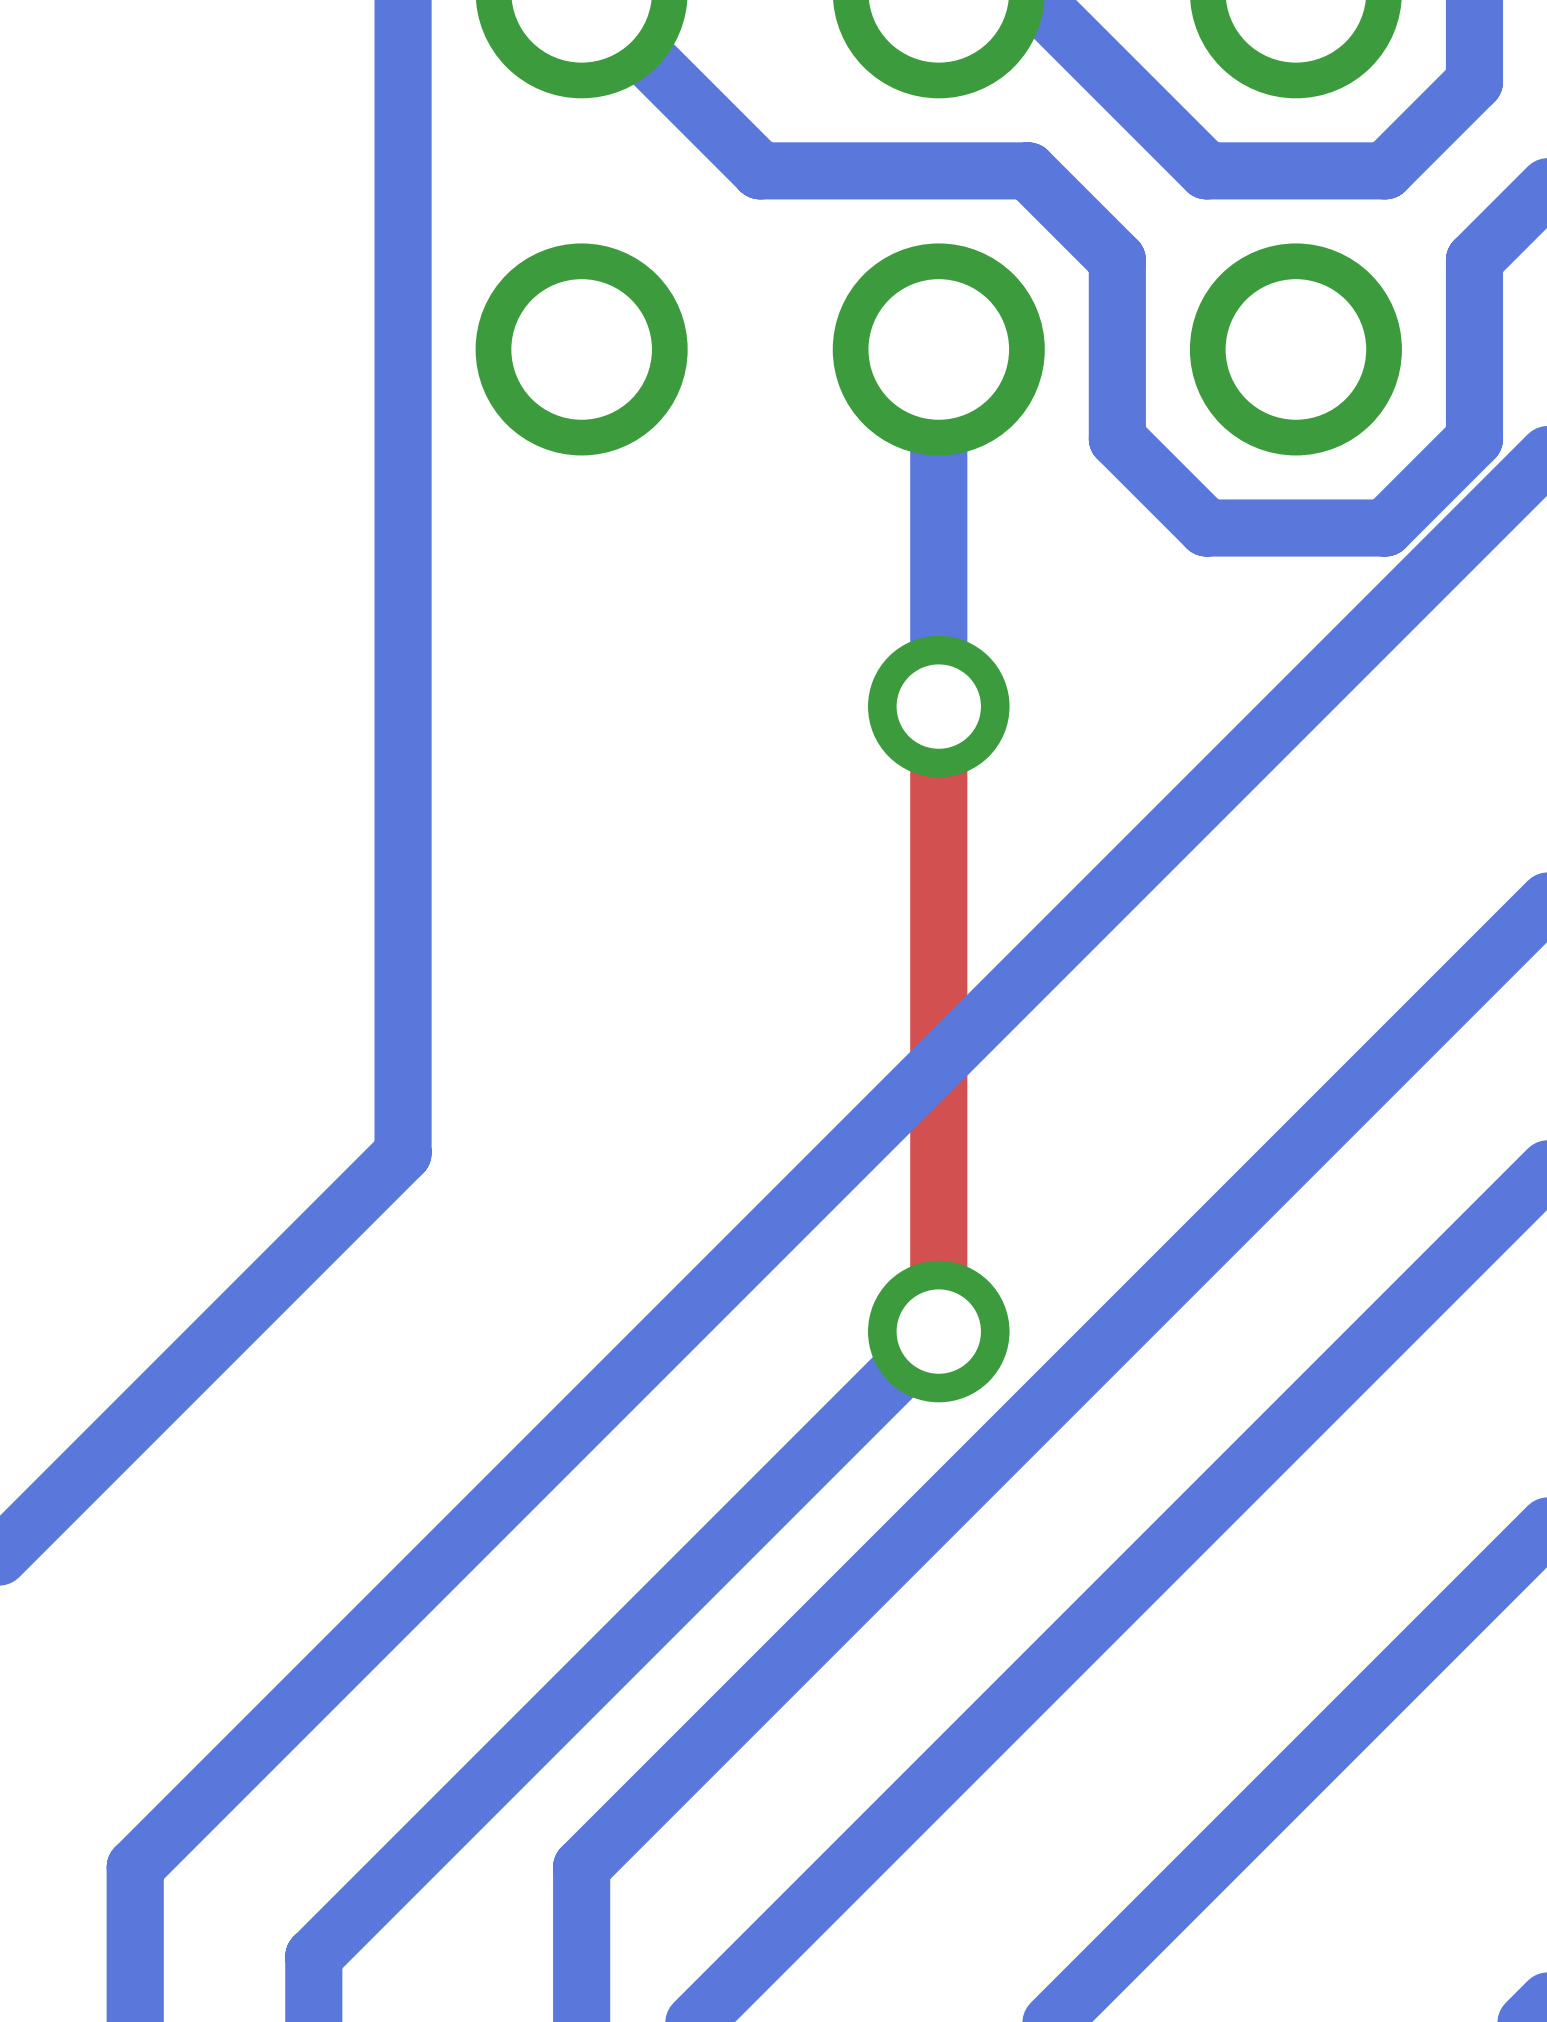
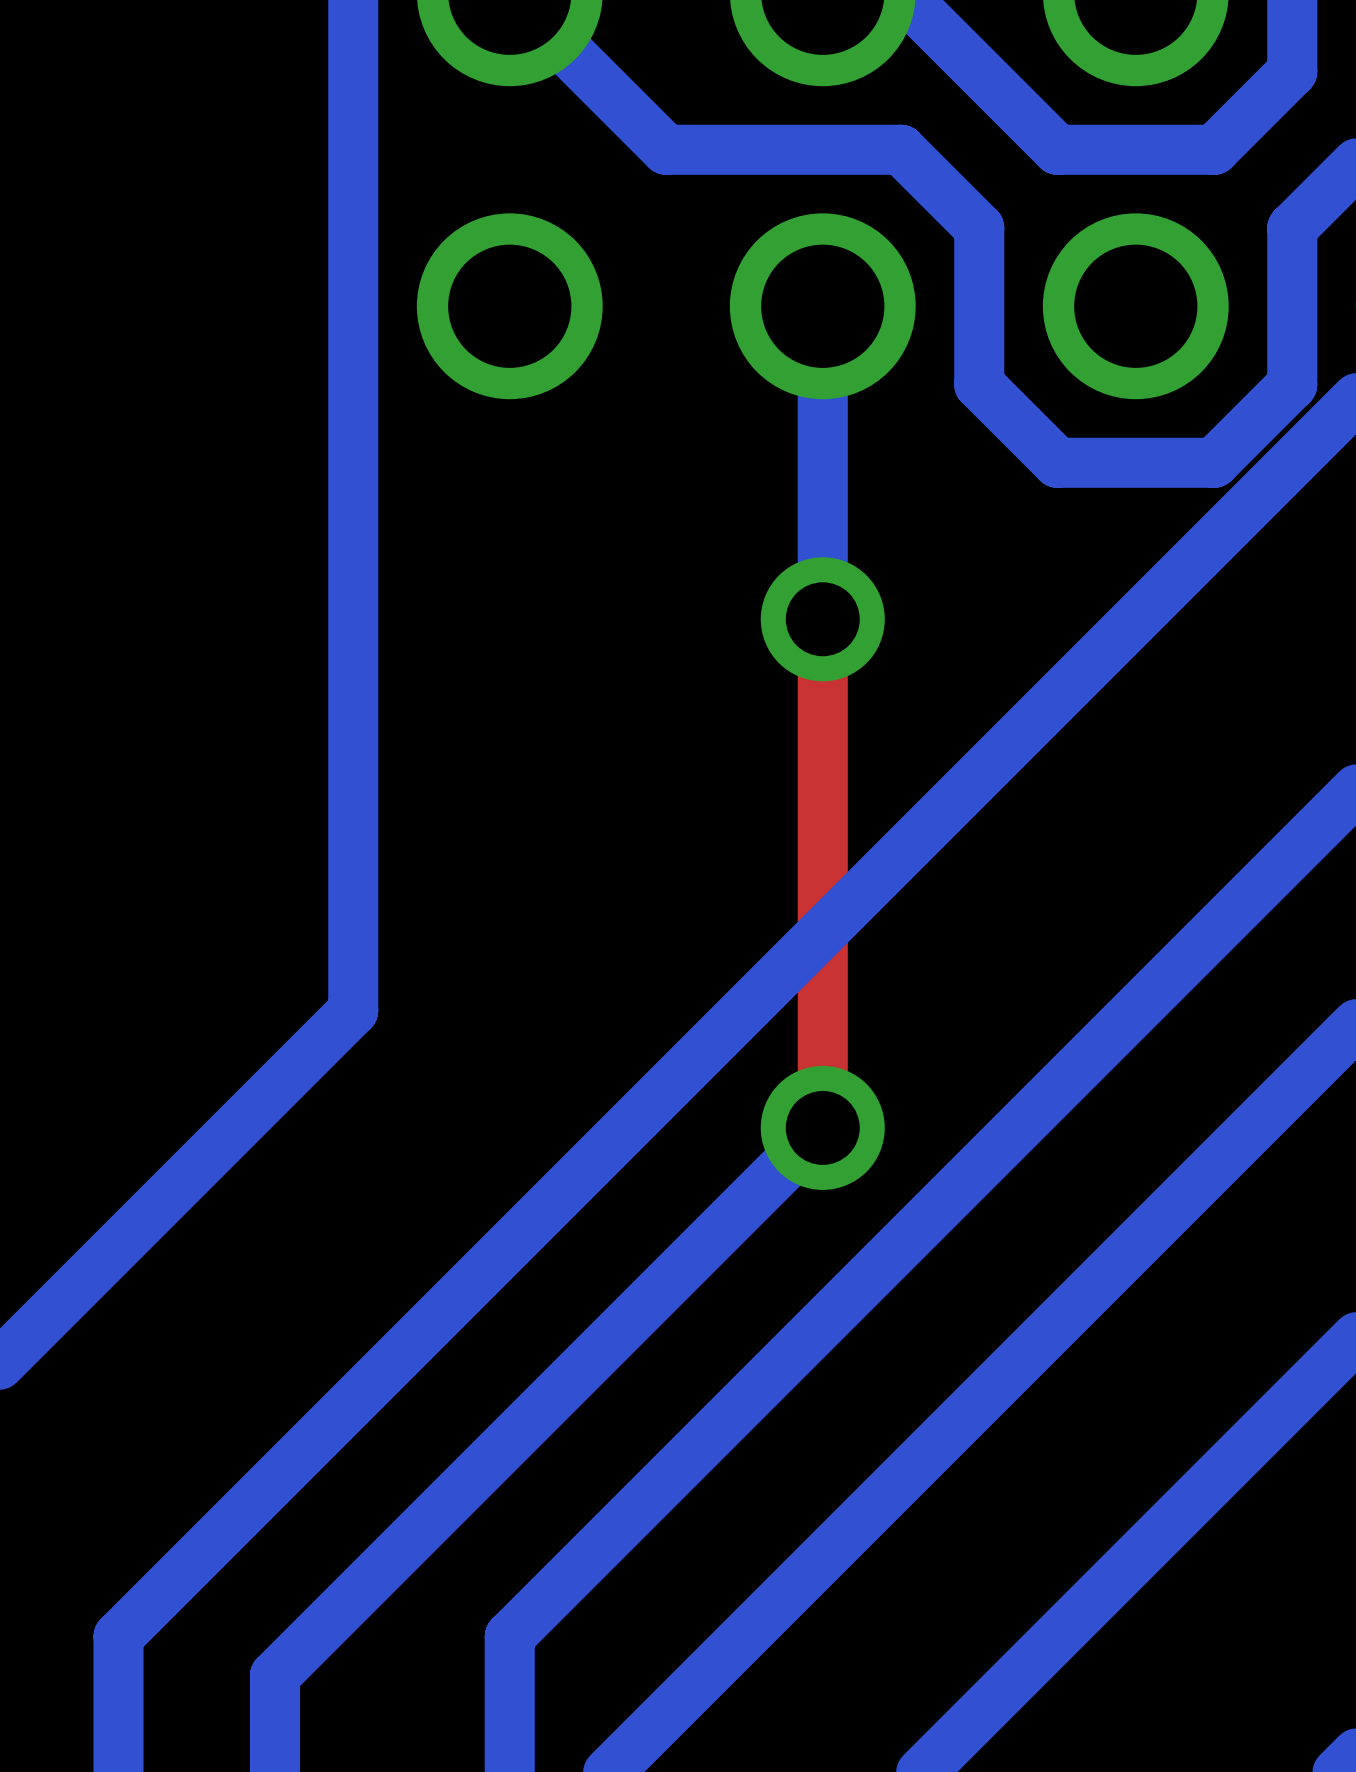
bottom track: (938, 1331) (313, 1956) -> (822, 1127) (275, 1675) (275, 1714)
via position: (938, 1331) -> (822, 1127)

